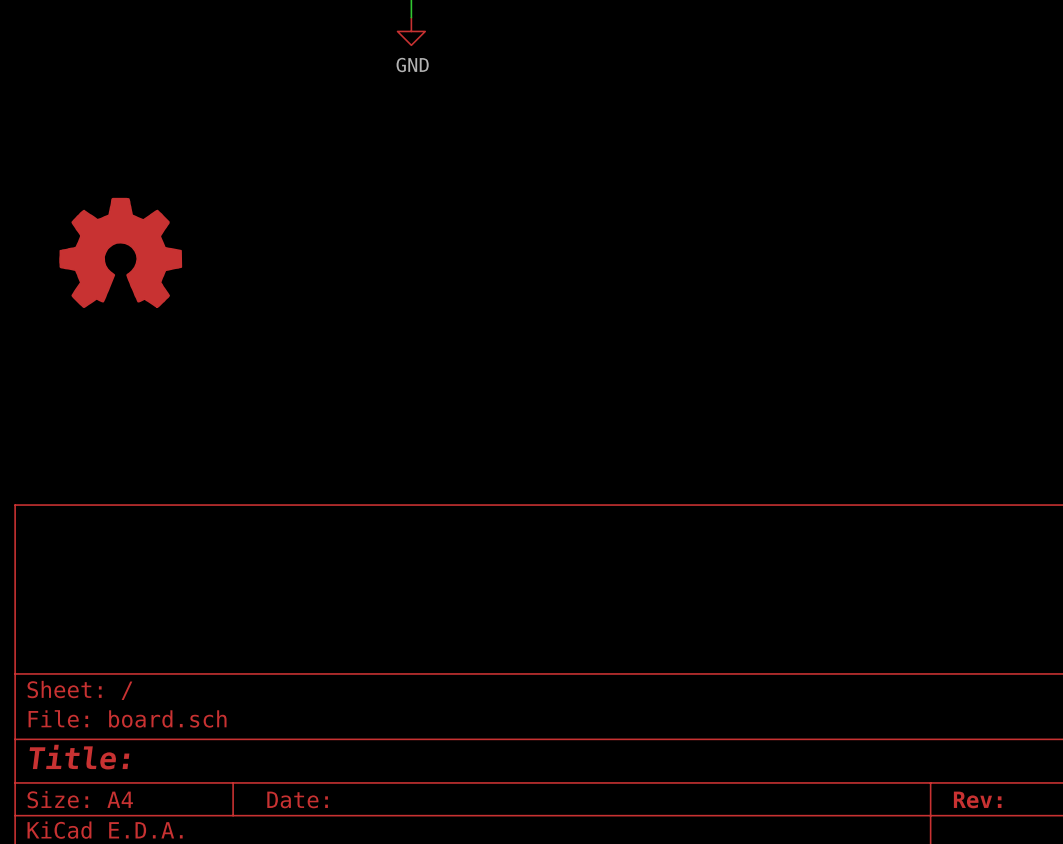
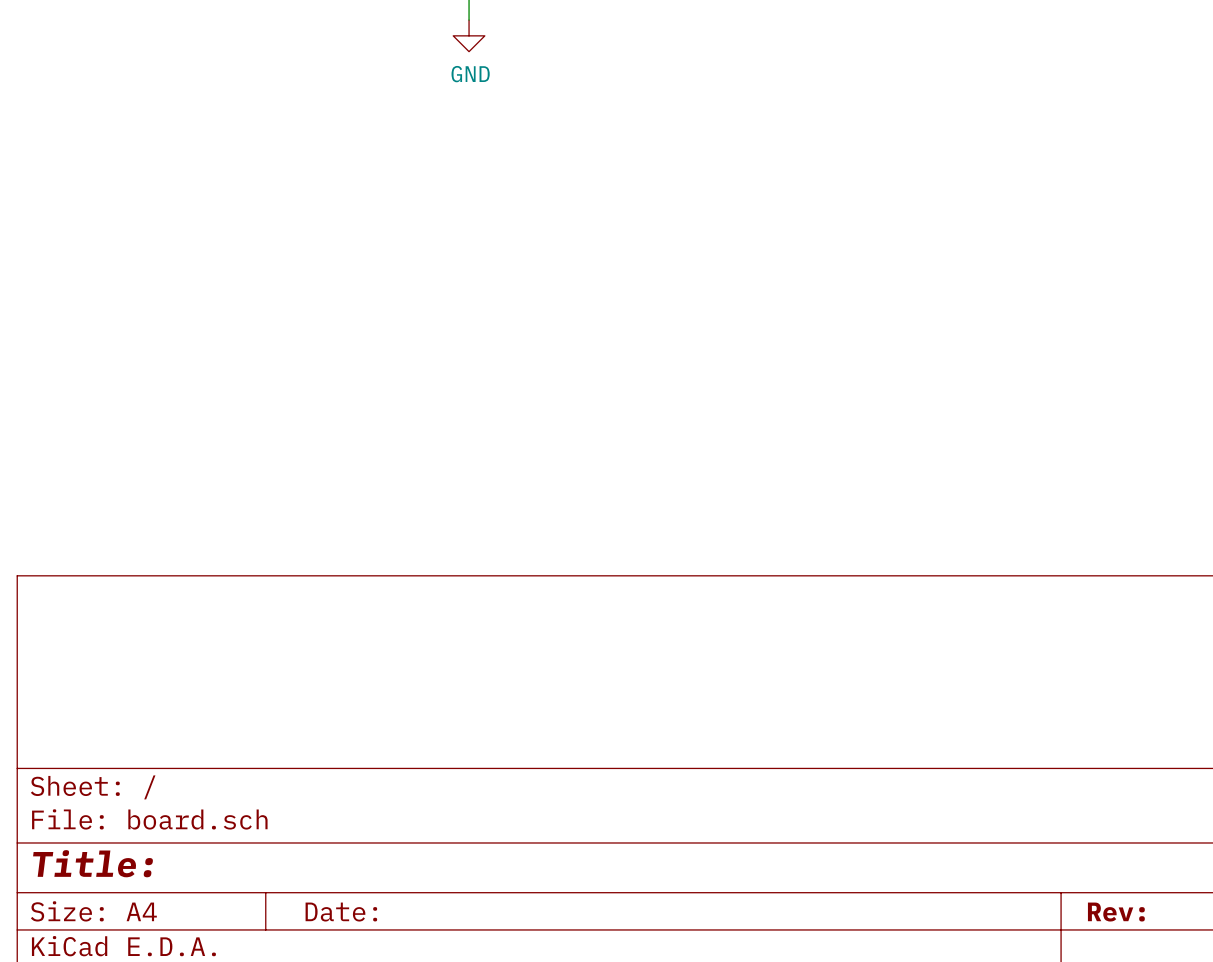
part: (120, 252) -> none

